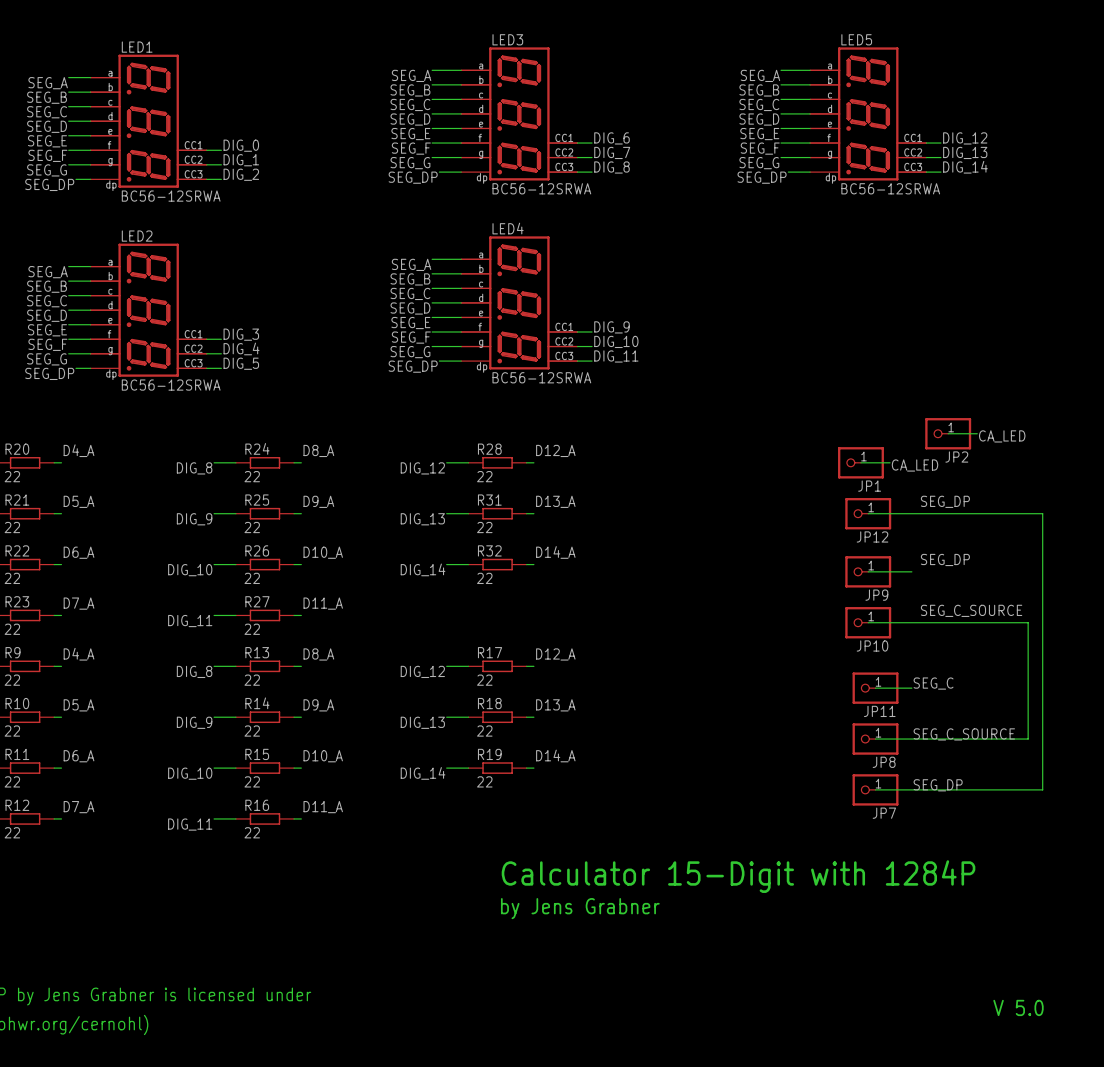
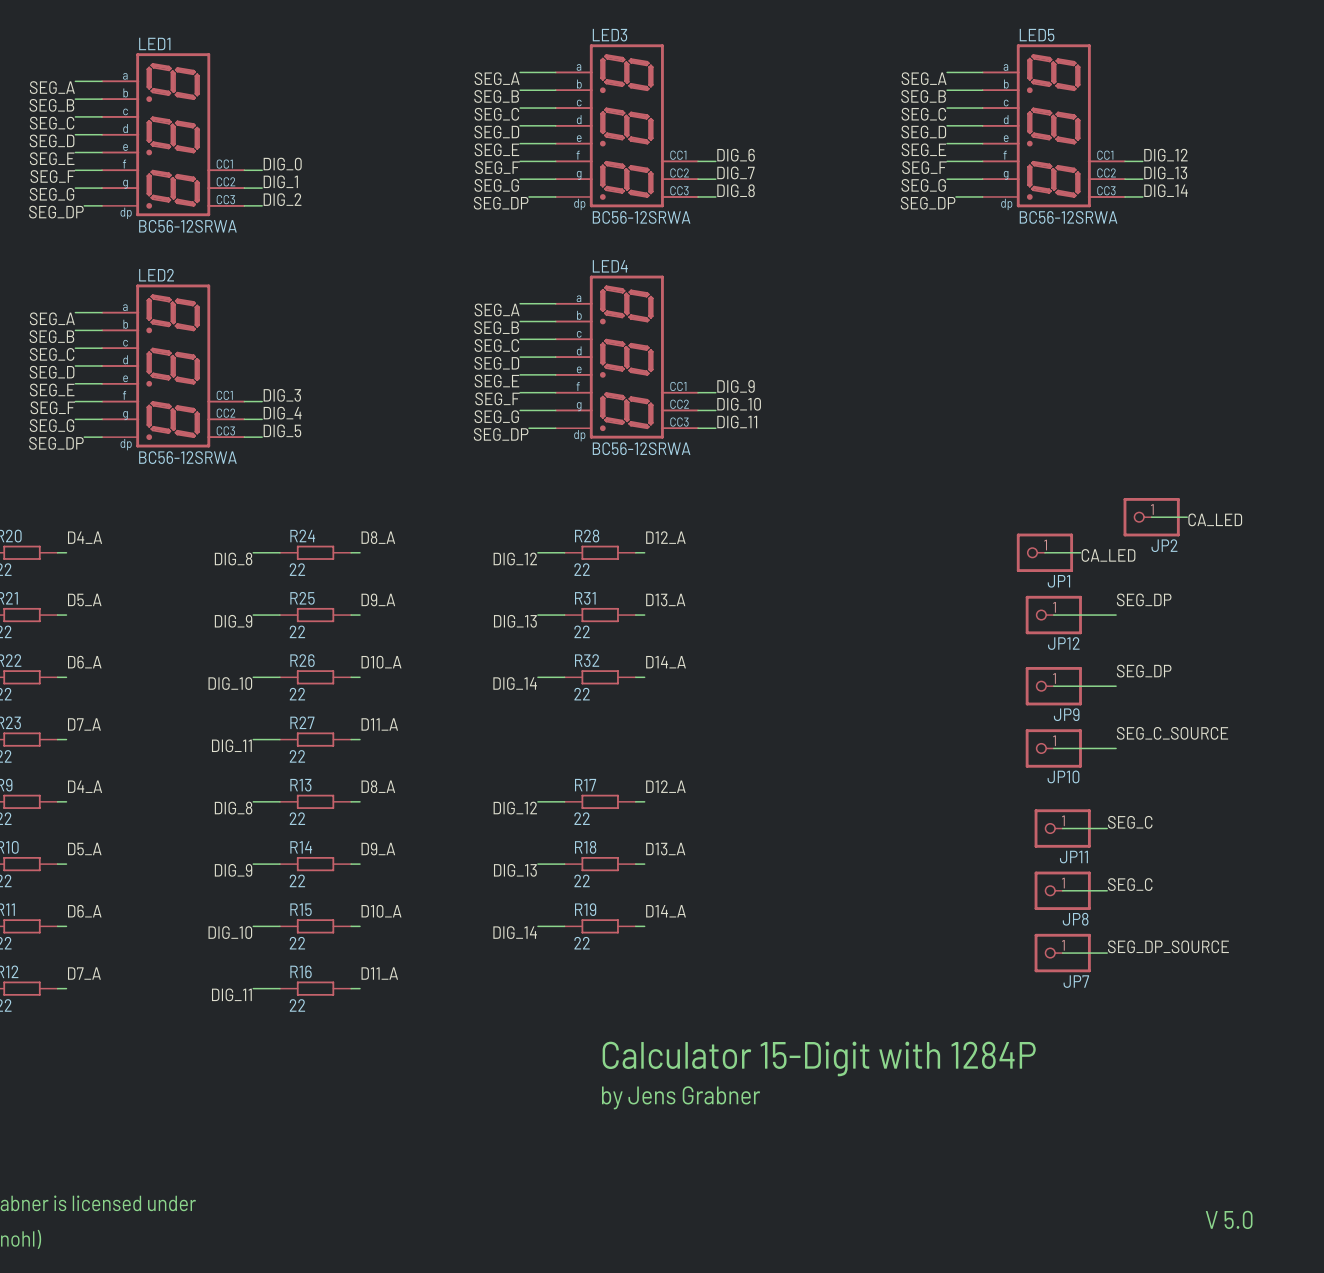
wire: (919, 513) (1042, 513) (1042, 789) (911, 789) -> none
wire: none -> (1107, 686) (1116, 686)
wire: (919, 622) (1028, 622) (1028, 739) (911, 739) -> none
label: SEG_C_SOURCE (964, 734) -> SEG_C (1130, 884)
label: SEG_DP (938, 785) -> SEG_DP_SOURCE (1168, 946)

